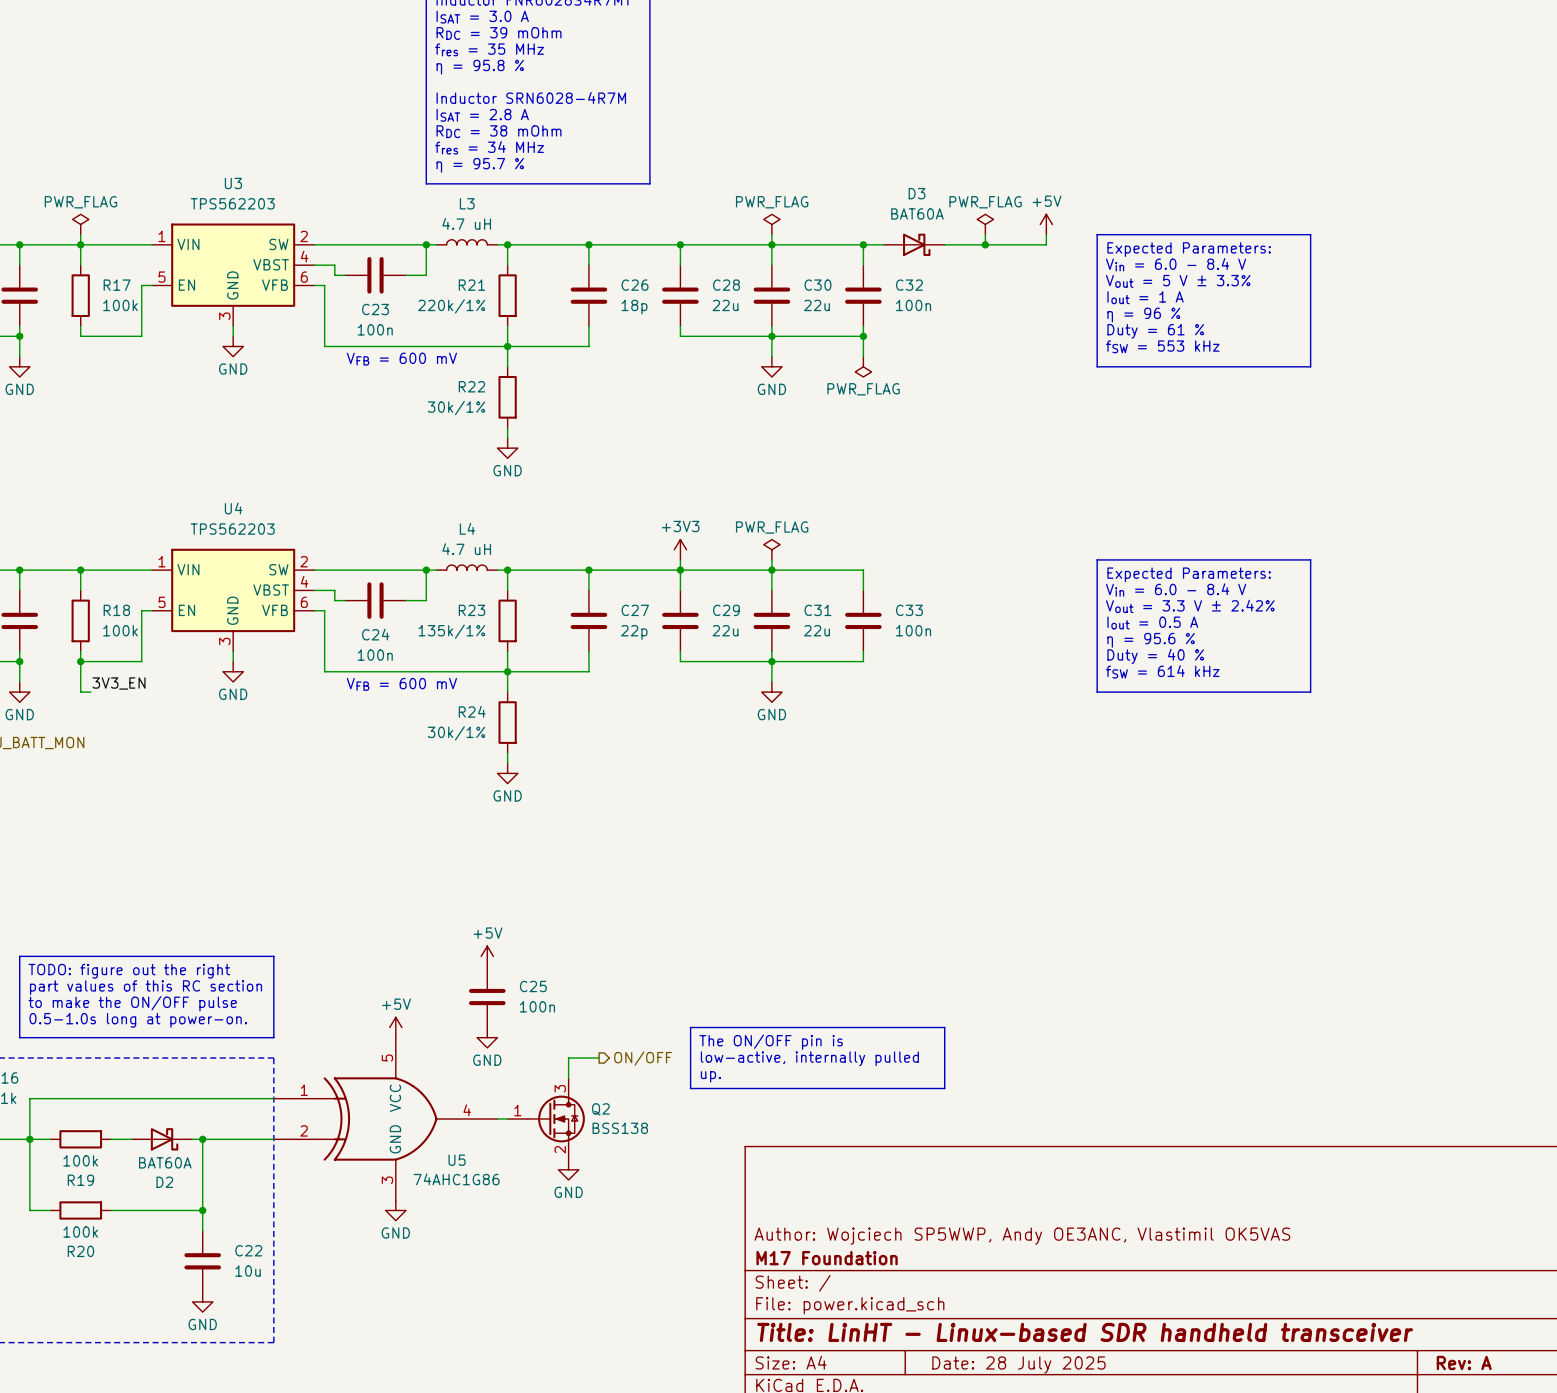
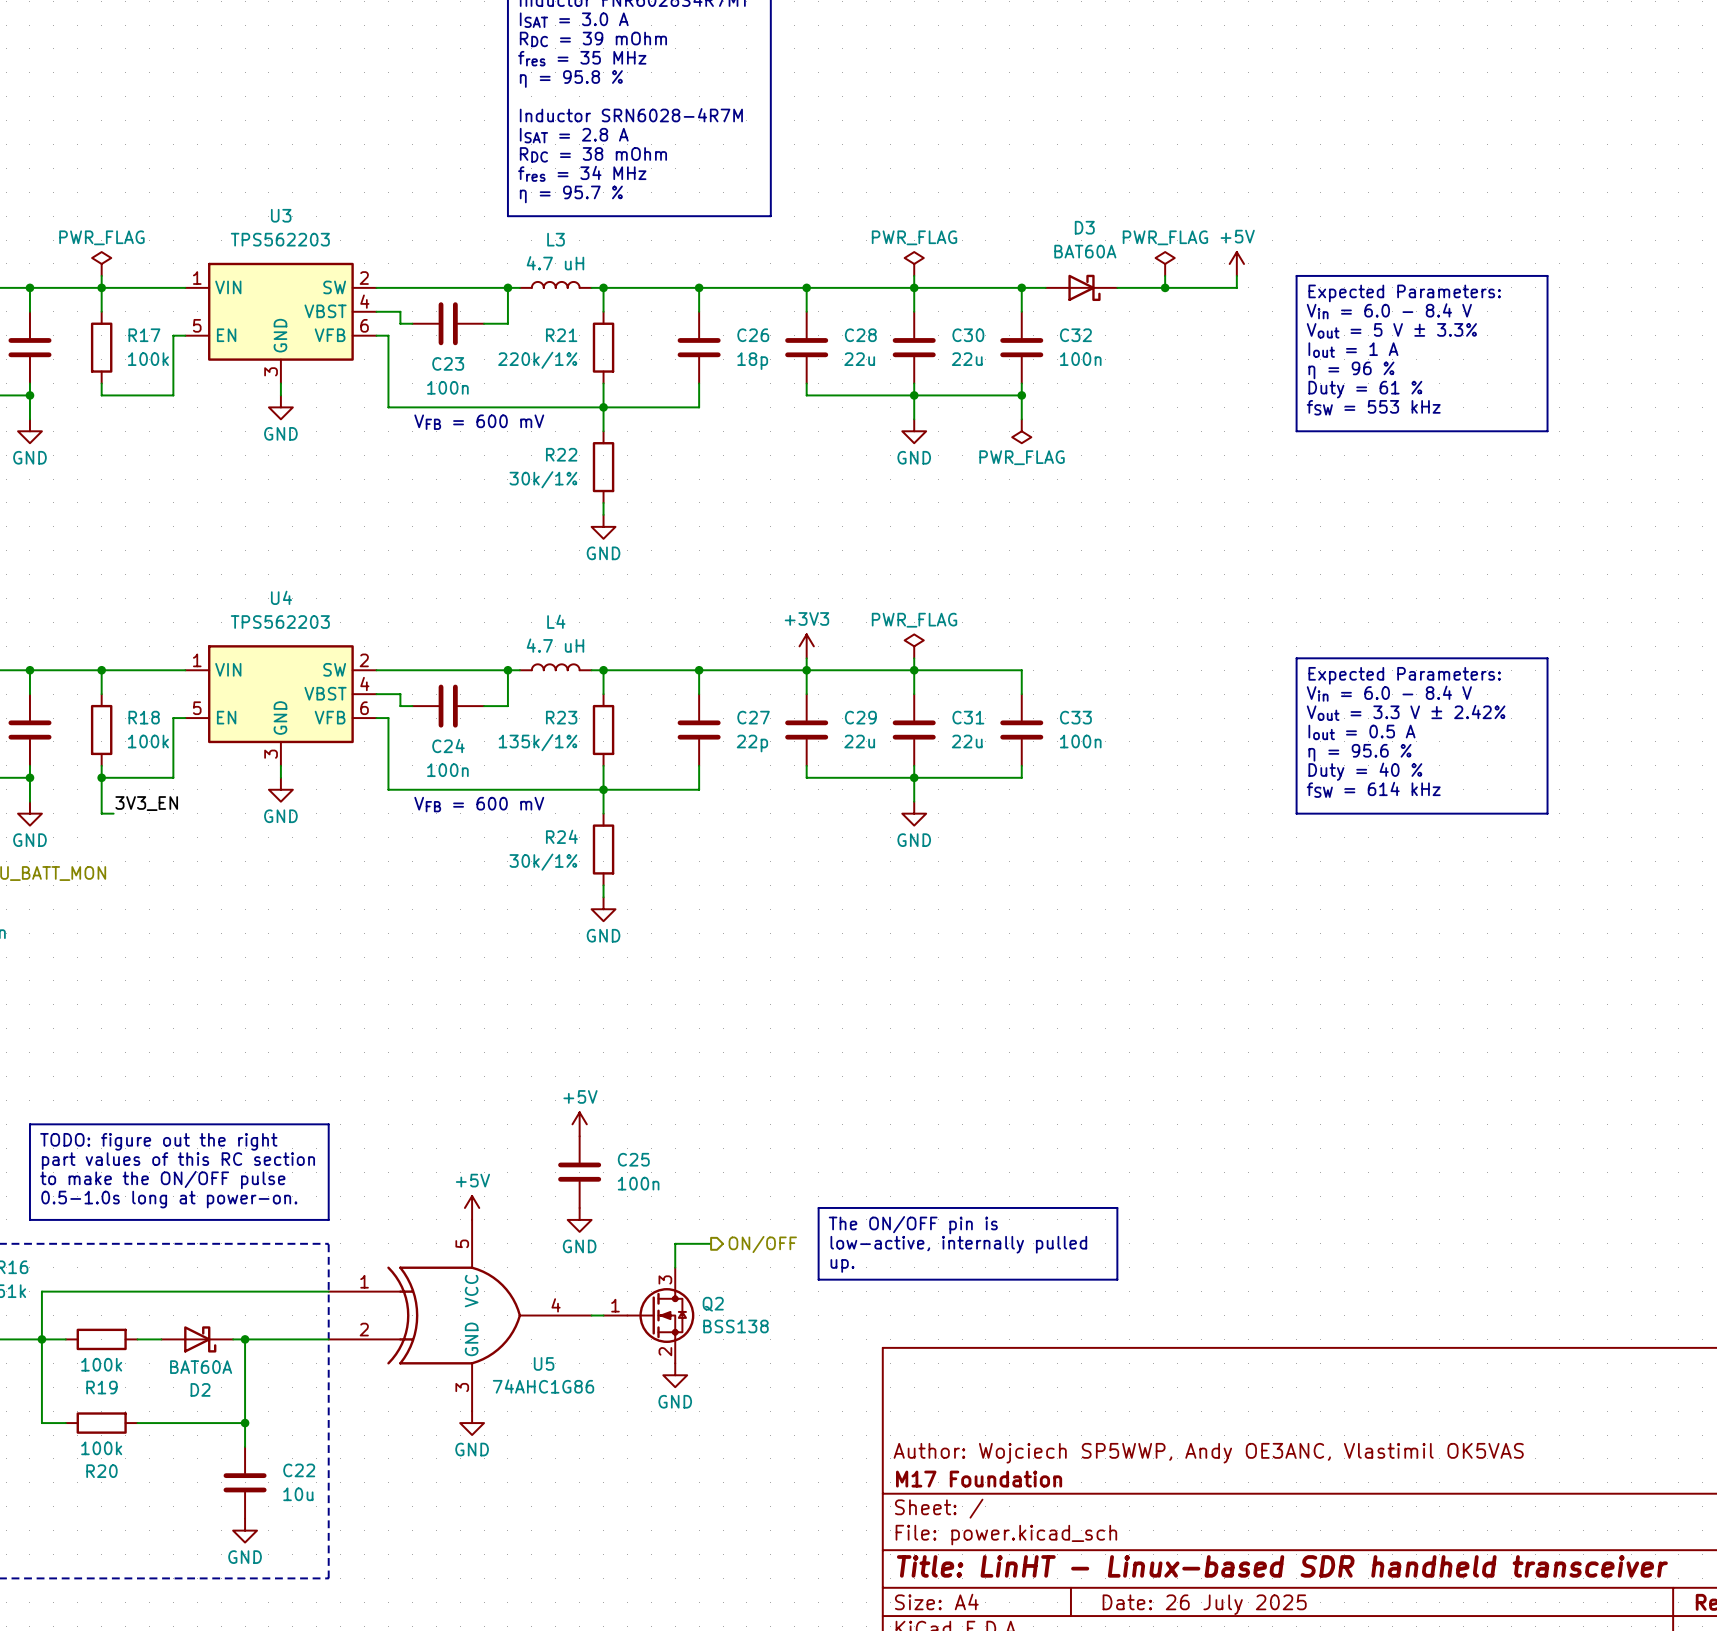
title block: Date: 28 July 2025 (1018, 1364) -> Date: 26 July 2025 (1204, 1604)

